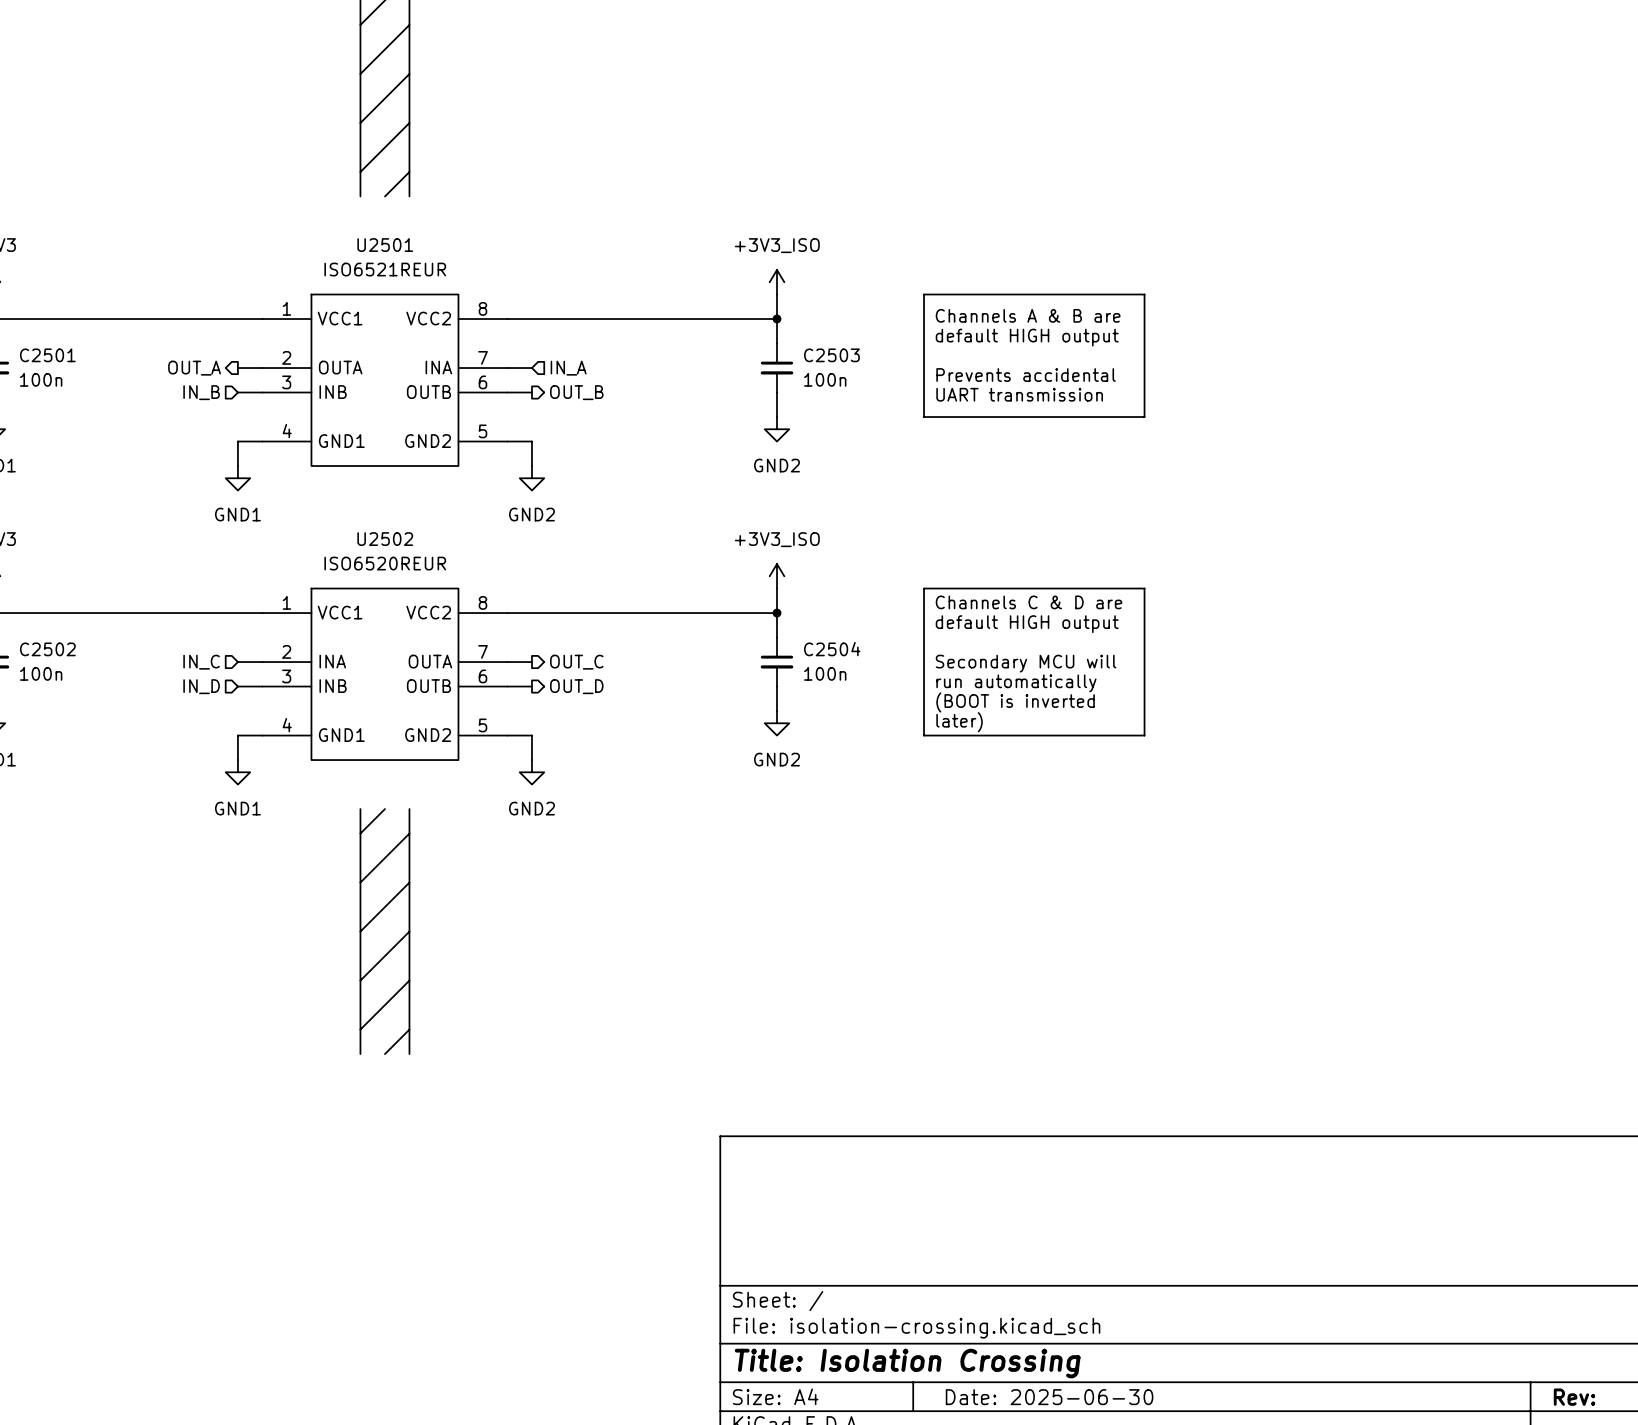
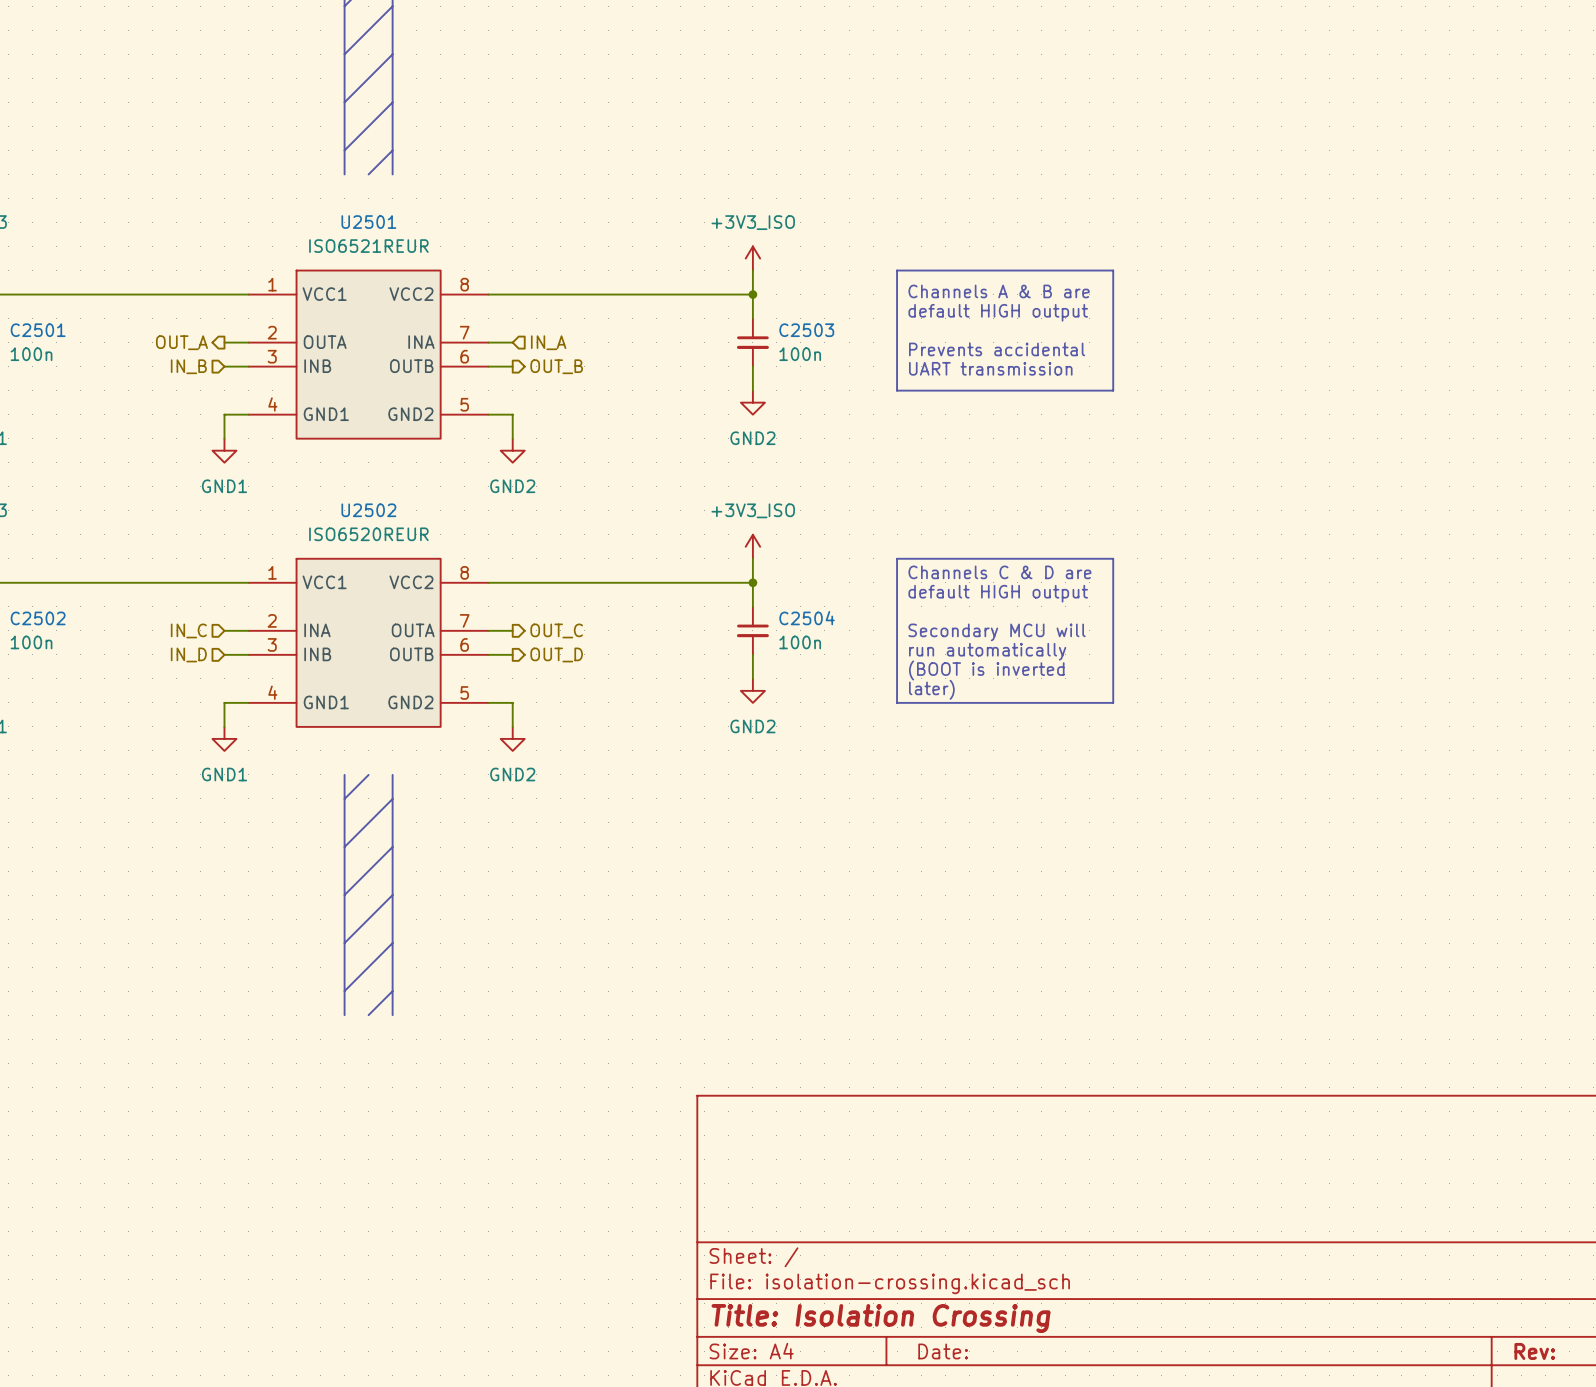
title block: Date: 2025-06-30 (1049, 1397) -> Date: (943, 1351)

